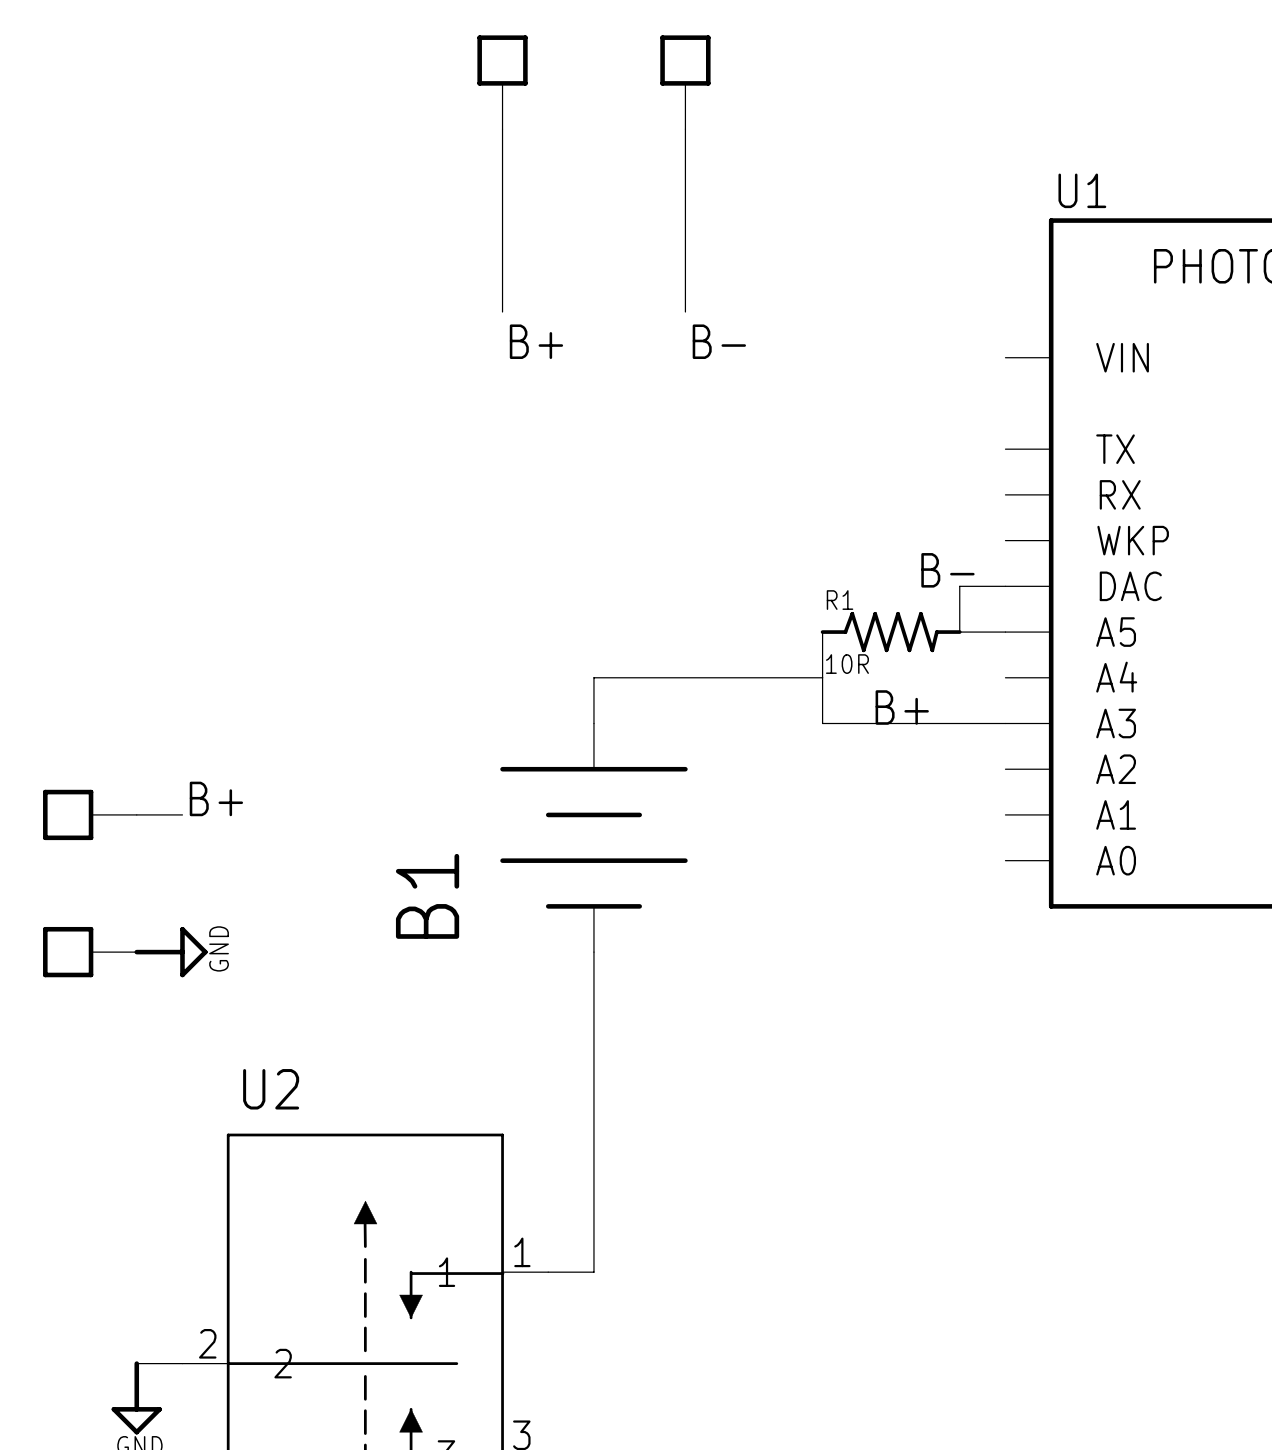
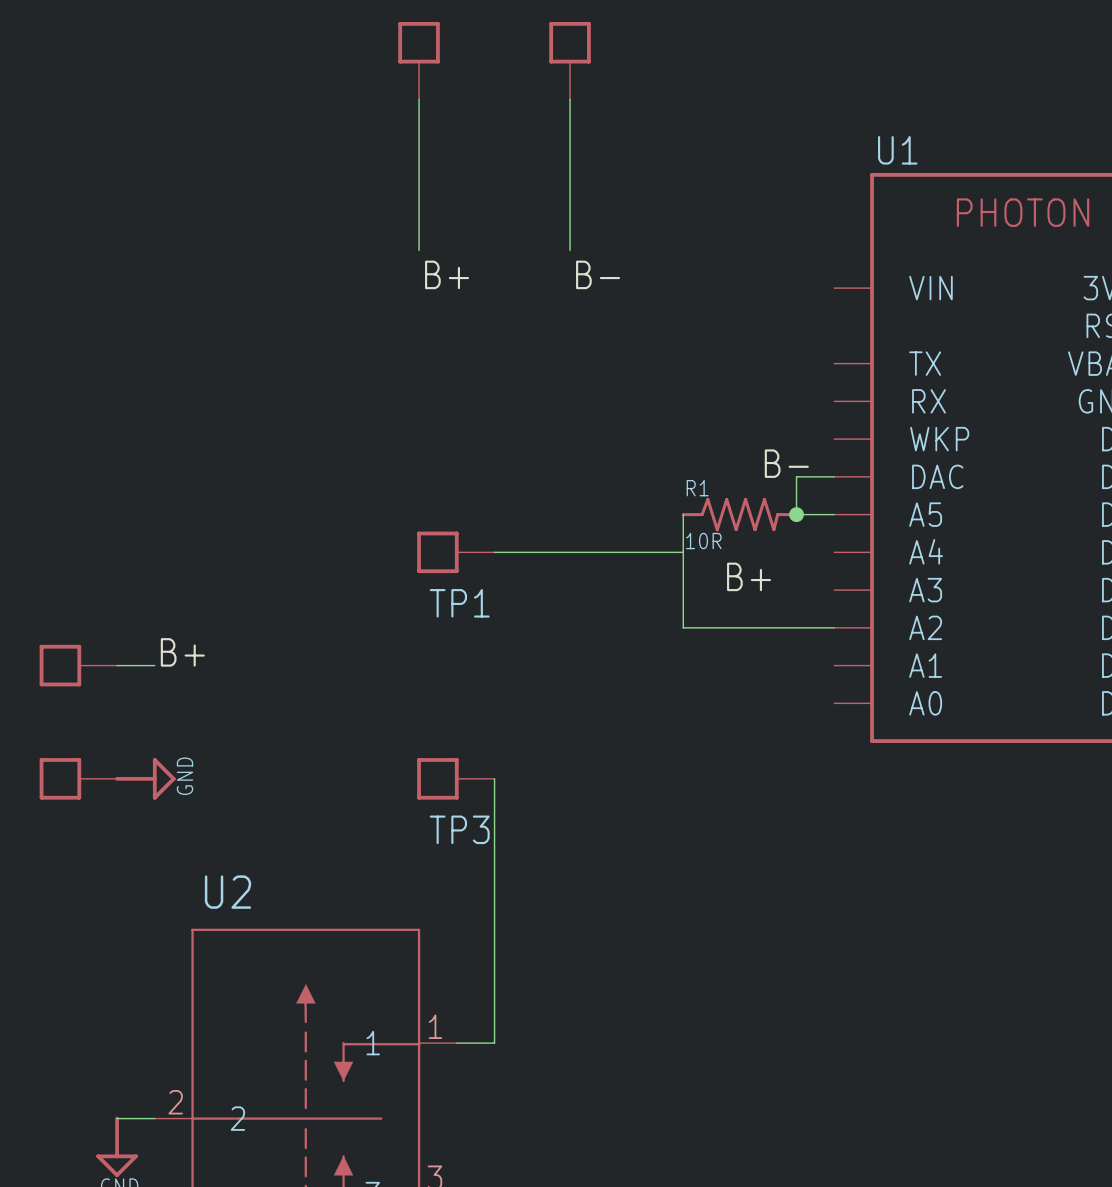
junction: none -> (796, 514)
TP1: none -> (455, 552)
wire: (593, 677) (593, 723) -> none
wire: (822, 723) (1005, 723) -> (683, 590) (683, 627) (834, 627)
B1: (593, 837) -> none
TP3: none -> (455, 778)

